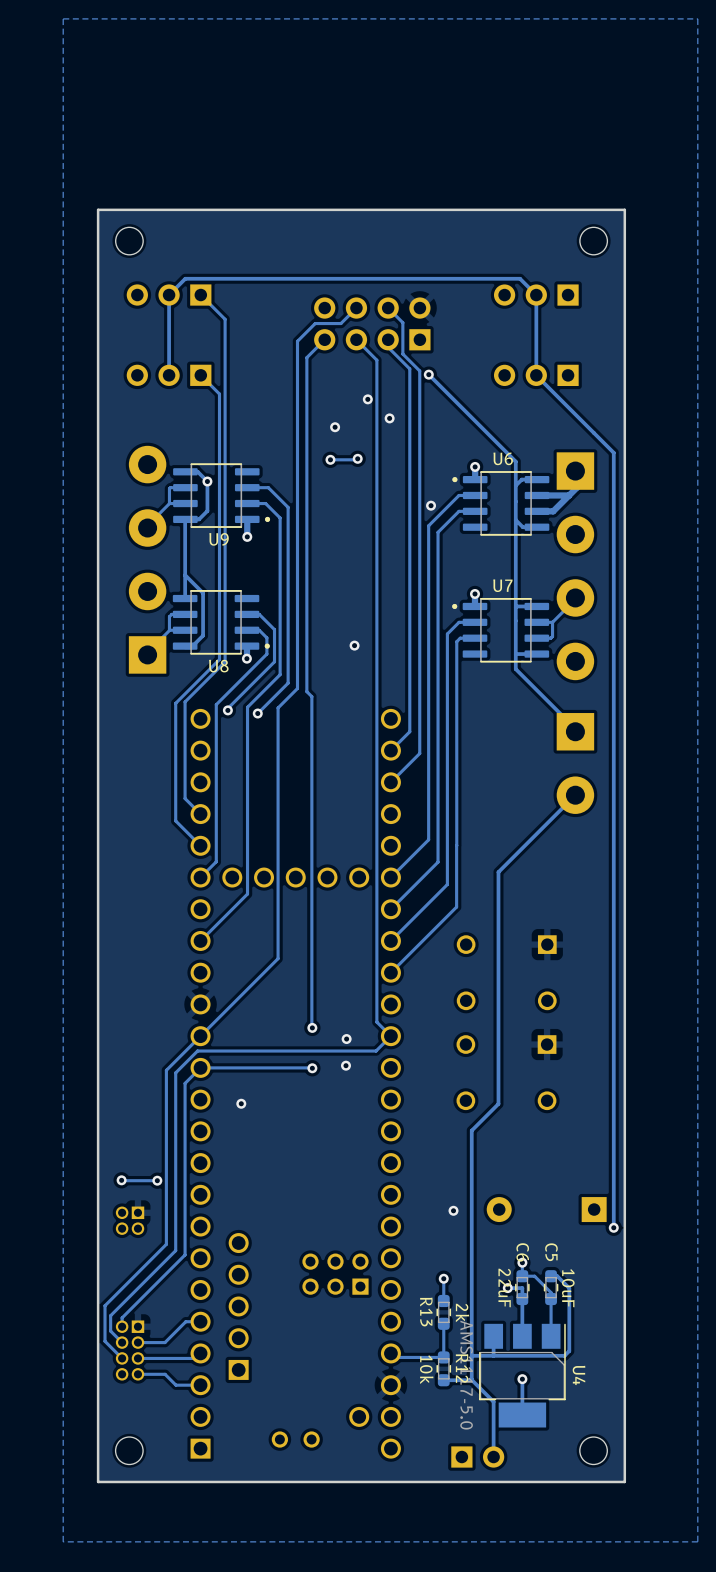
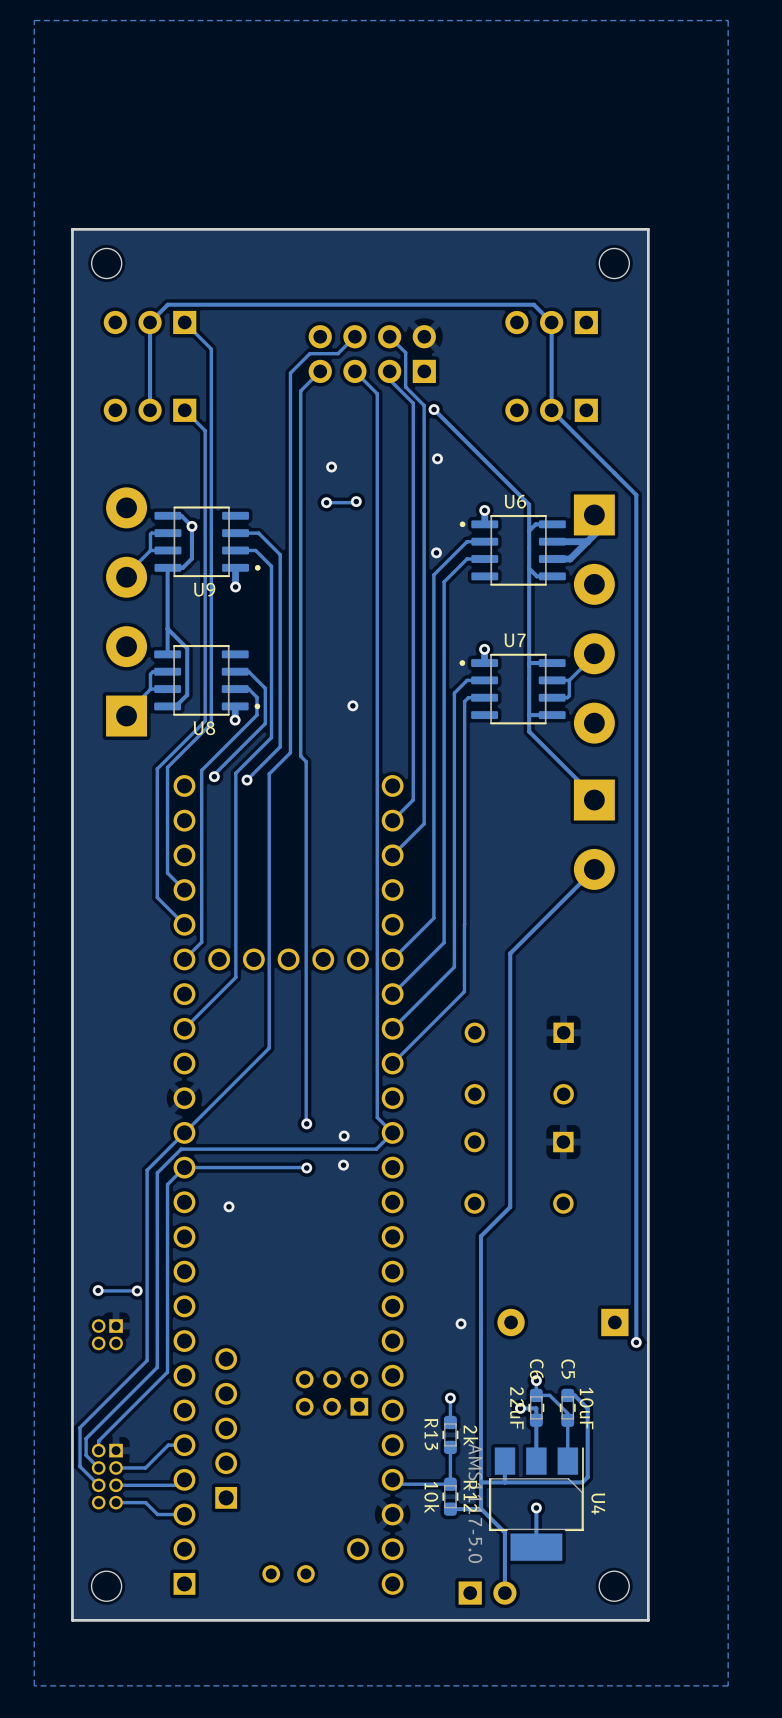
via: (367, 399) -> none
via: (389, 418) -> none
via: none -> (437, 458)

